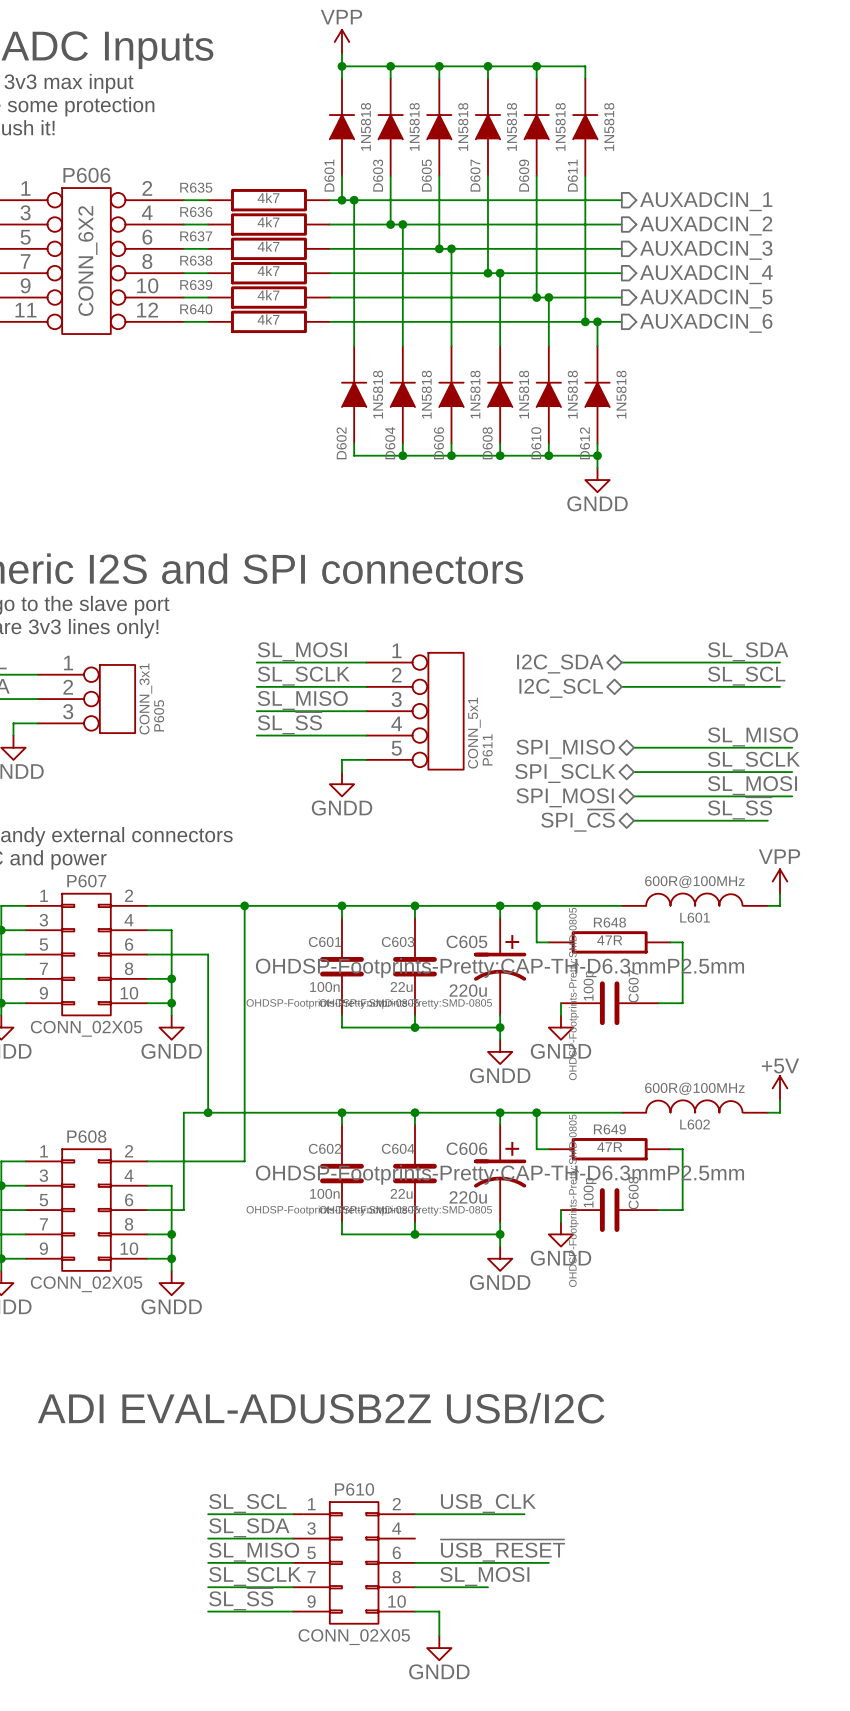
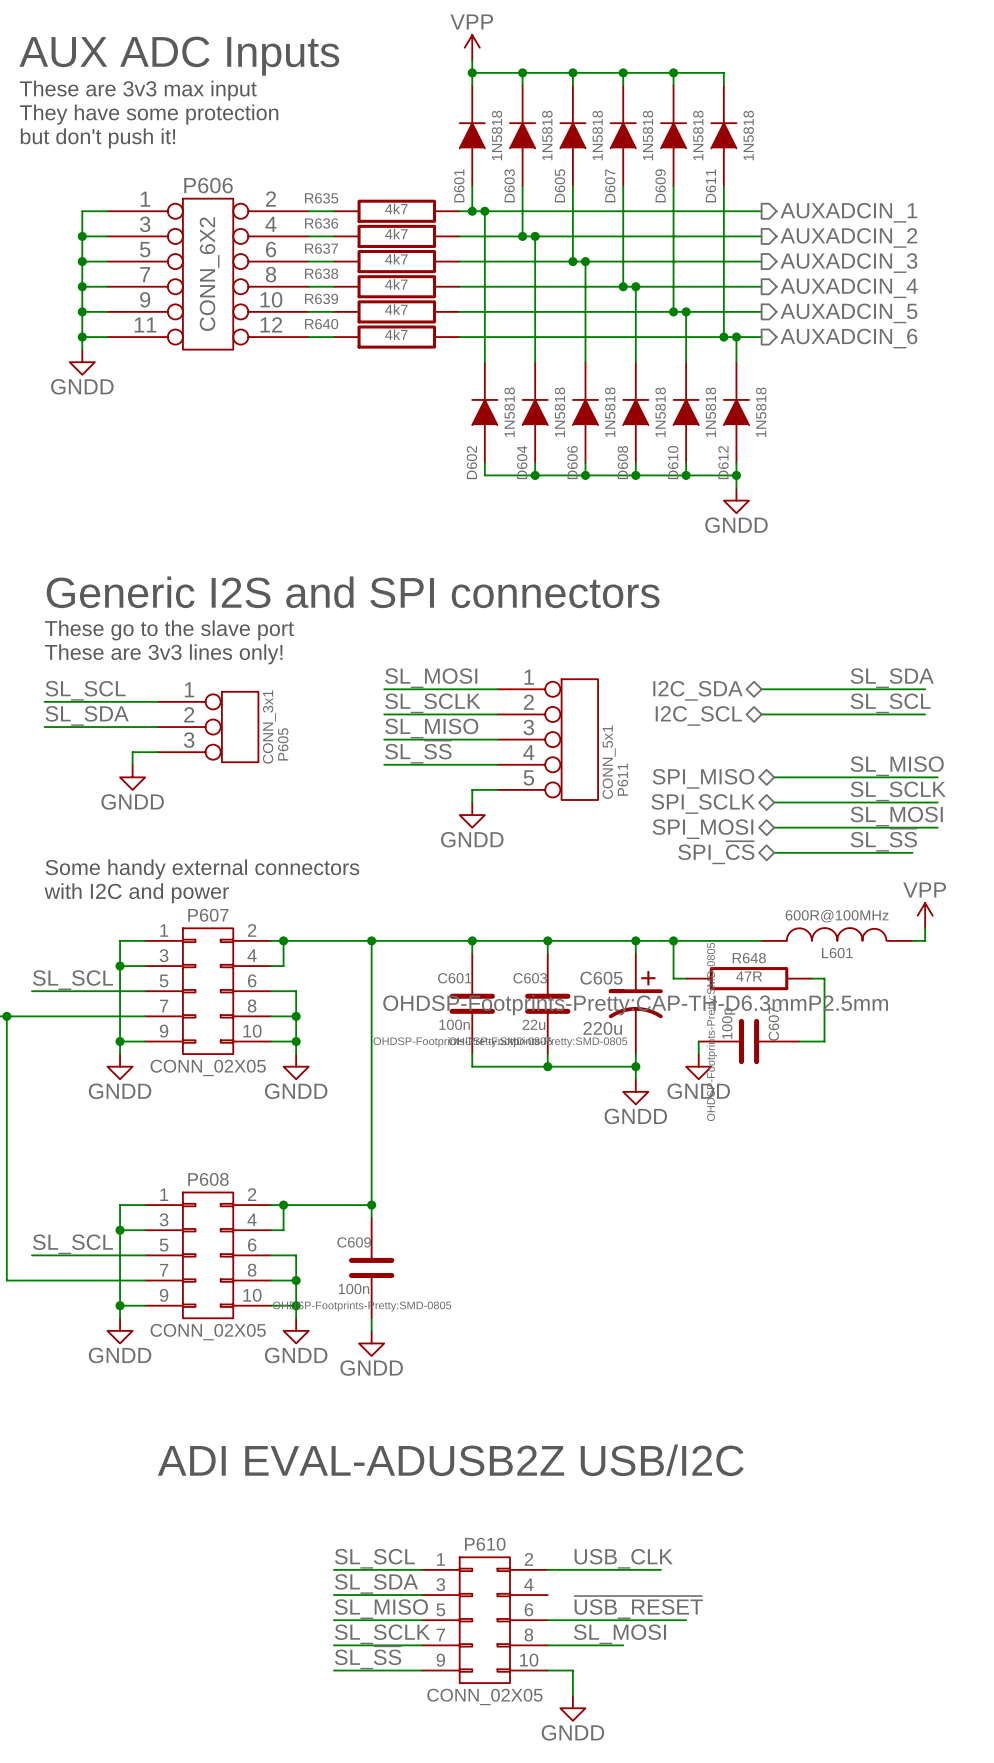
junction: none -> (283, 940)
wire: (159, 930) (171, 930) (171, 954) (208, 954) (208, 1112) -> (283, 966) (283, 940)
power symbol: +5V (780, 1088) -> none
wire: (780, 1100) (780, 1112) (767, 1112) -> none
L602: 600R@100MHz (694, 1106) -> none
junction: (208, 1112) -> none
wire: (341, 1112) (341, 1124) -> none
junction: (341, 1112) -> none
wire: (414, 1112) (414, 1124) -> (371, 1205) (371, 1217)
junction: (414, 1112) -> none
wire: (500, 1112) (500, 1124) -> none
junction: (500, 1112) -> none
wire: (536, 1112) (536, 1149) (548, 1149) -> none
junction: (536, 1112) -> none
wire: (621, 1112) (183, 1112) (183, 1210) (171, 1210) (171, 1185) (159, 1185) -> (283, 1205) (283, 1230)
R649: 47R (609, 1149) -> none
wire: (670, 1149) (682, 1149) (682, 1210) (658, 1210) -> none
junction: none -> (283, 1205)
junction: none -> (371, 1205)
C602: 100n (341, 1173) -> none
C604: 22u (414, 1173) -> none
C606: 220u (500, 1173) -> none
wire: (560, 1210) (560, 1222) -> none
C608: 100p (609, 1210) -> none
C609: none -> 100n (371, 1267)
wire: (341, 1222) (341, 1234) (500, 1234) -> none
wire: (414, 1222) (414, 1234) -> (371, 1318) (371, 1330)
wire: (500, 1222) (500, 1246) -> none
junction: (414, 1234) -> none
junction: (500, 1234) -> none
power symbol: GNDD (560, 1234) -> none
power symbol: GNDD (500, 1258) -> none
power symbol: none -> GNDD (371, 1343)

